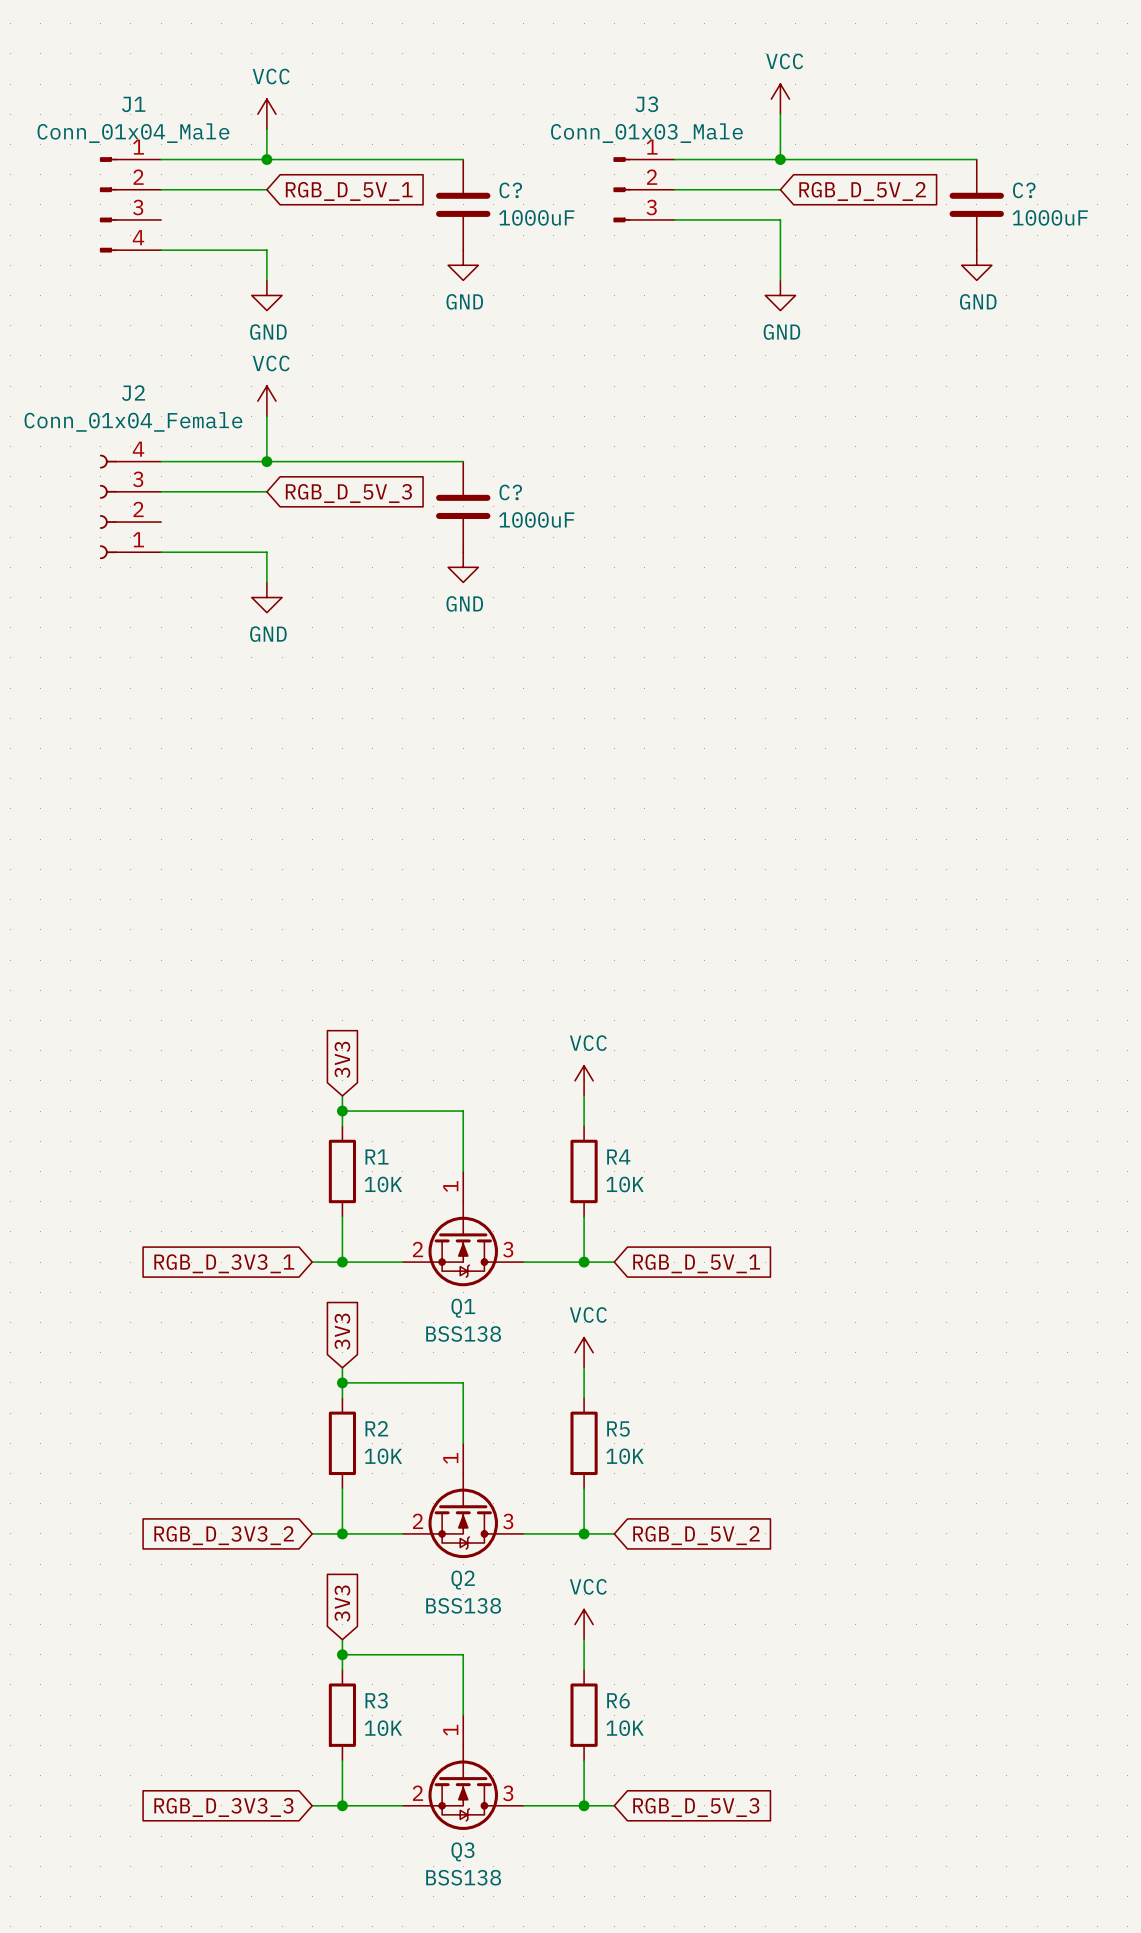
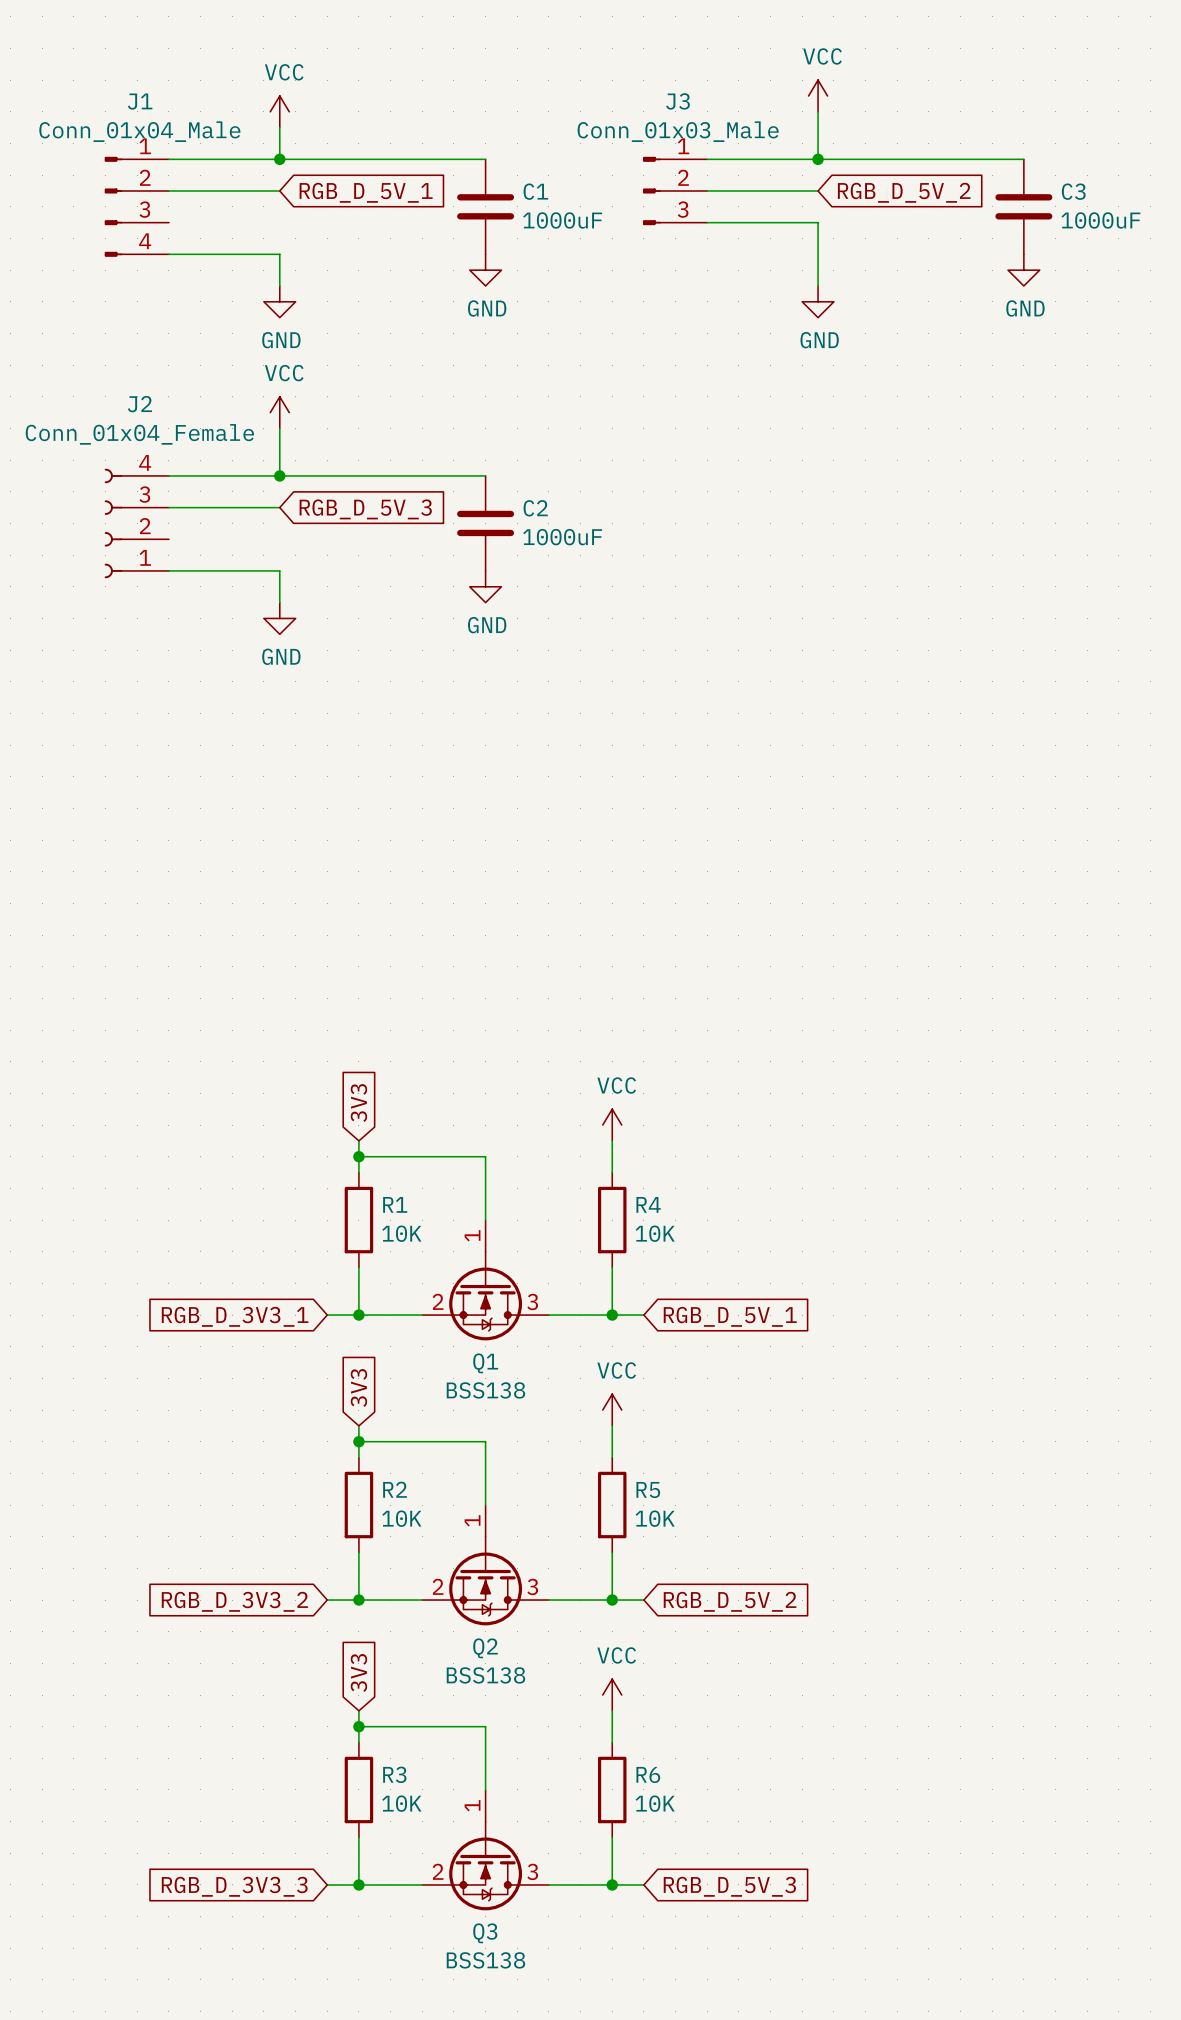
C? name: C? (510, 190) -> C1 (535, 191)
C? name: C? (1024, 190) -> C3 (1073, 191)
C? name: C? (510, 492) -> C2 (535, 508)

